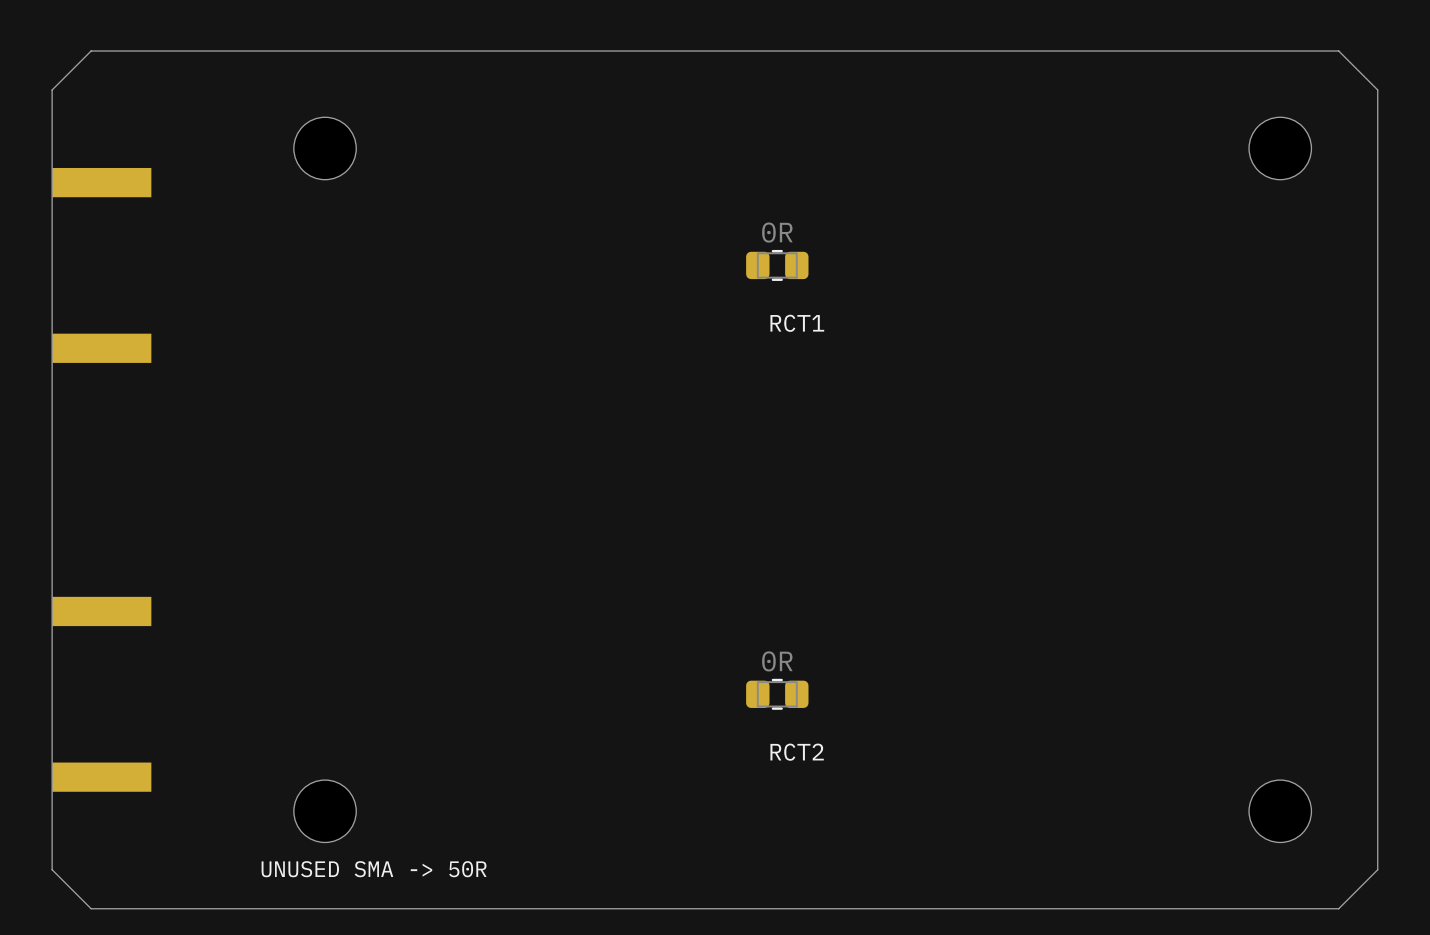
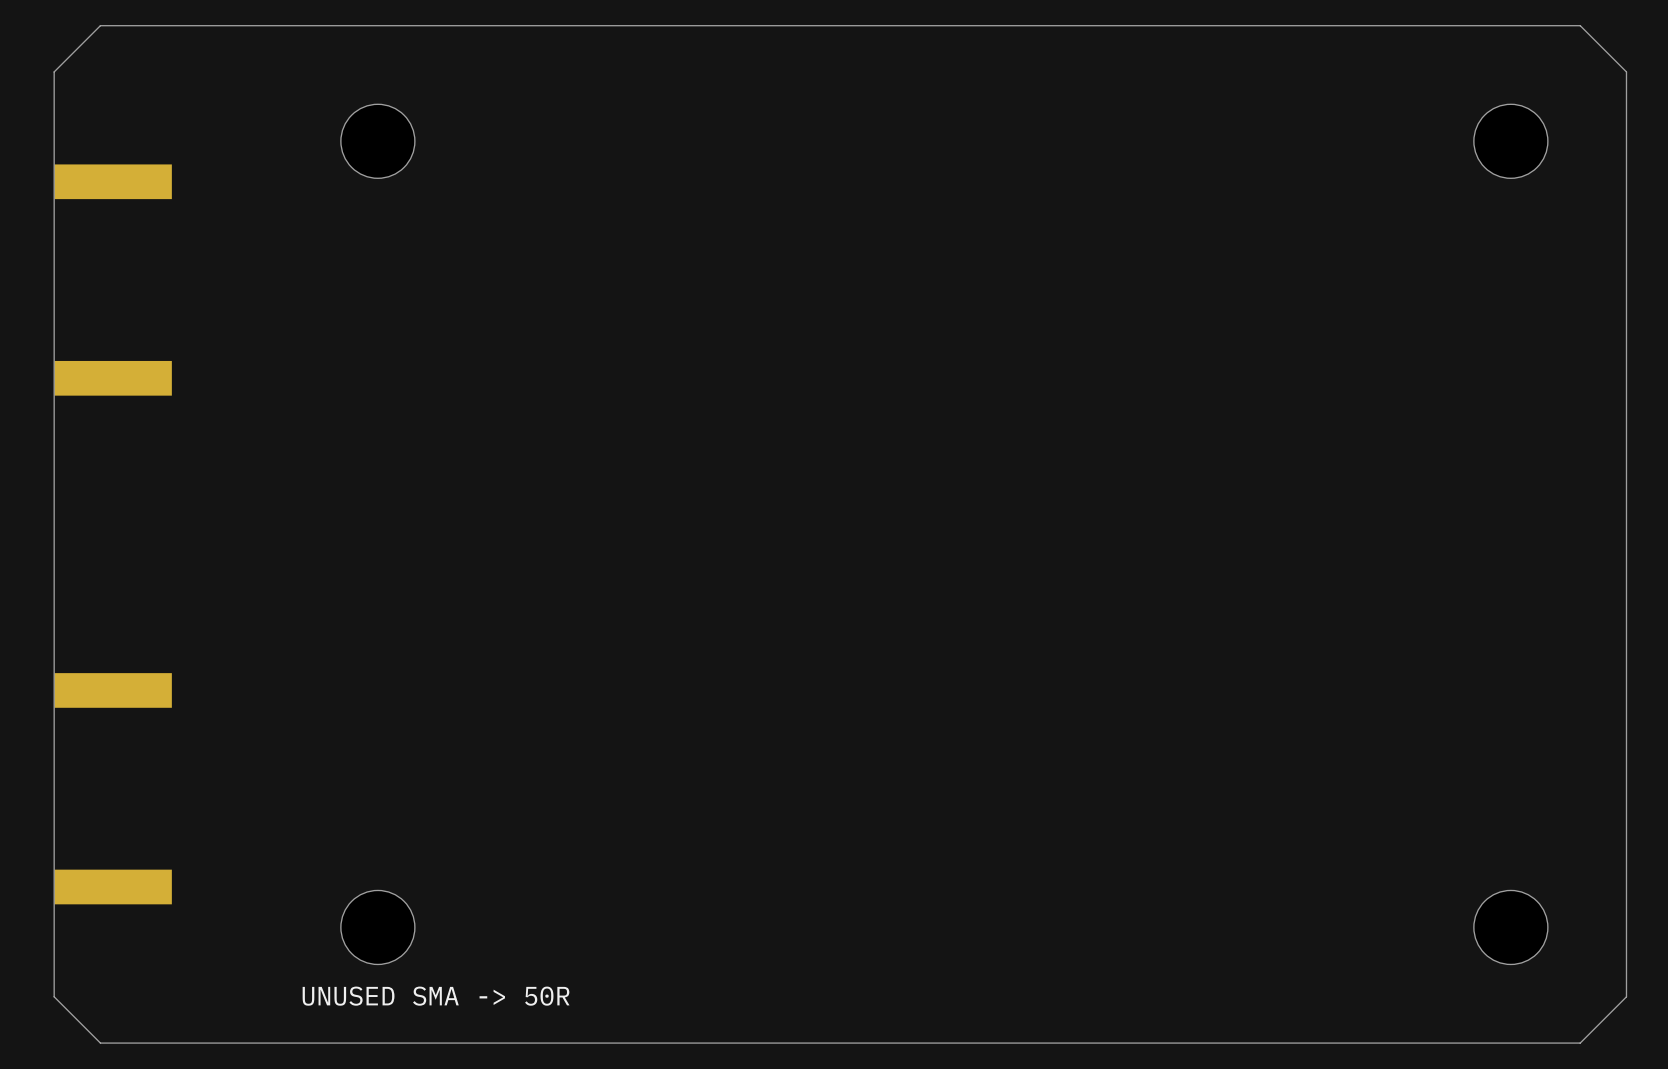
RCT1: 0R (777, 265) -> none
RCT2: 0R (777, 694) -> none

